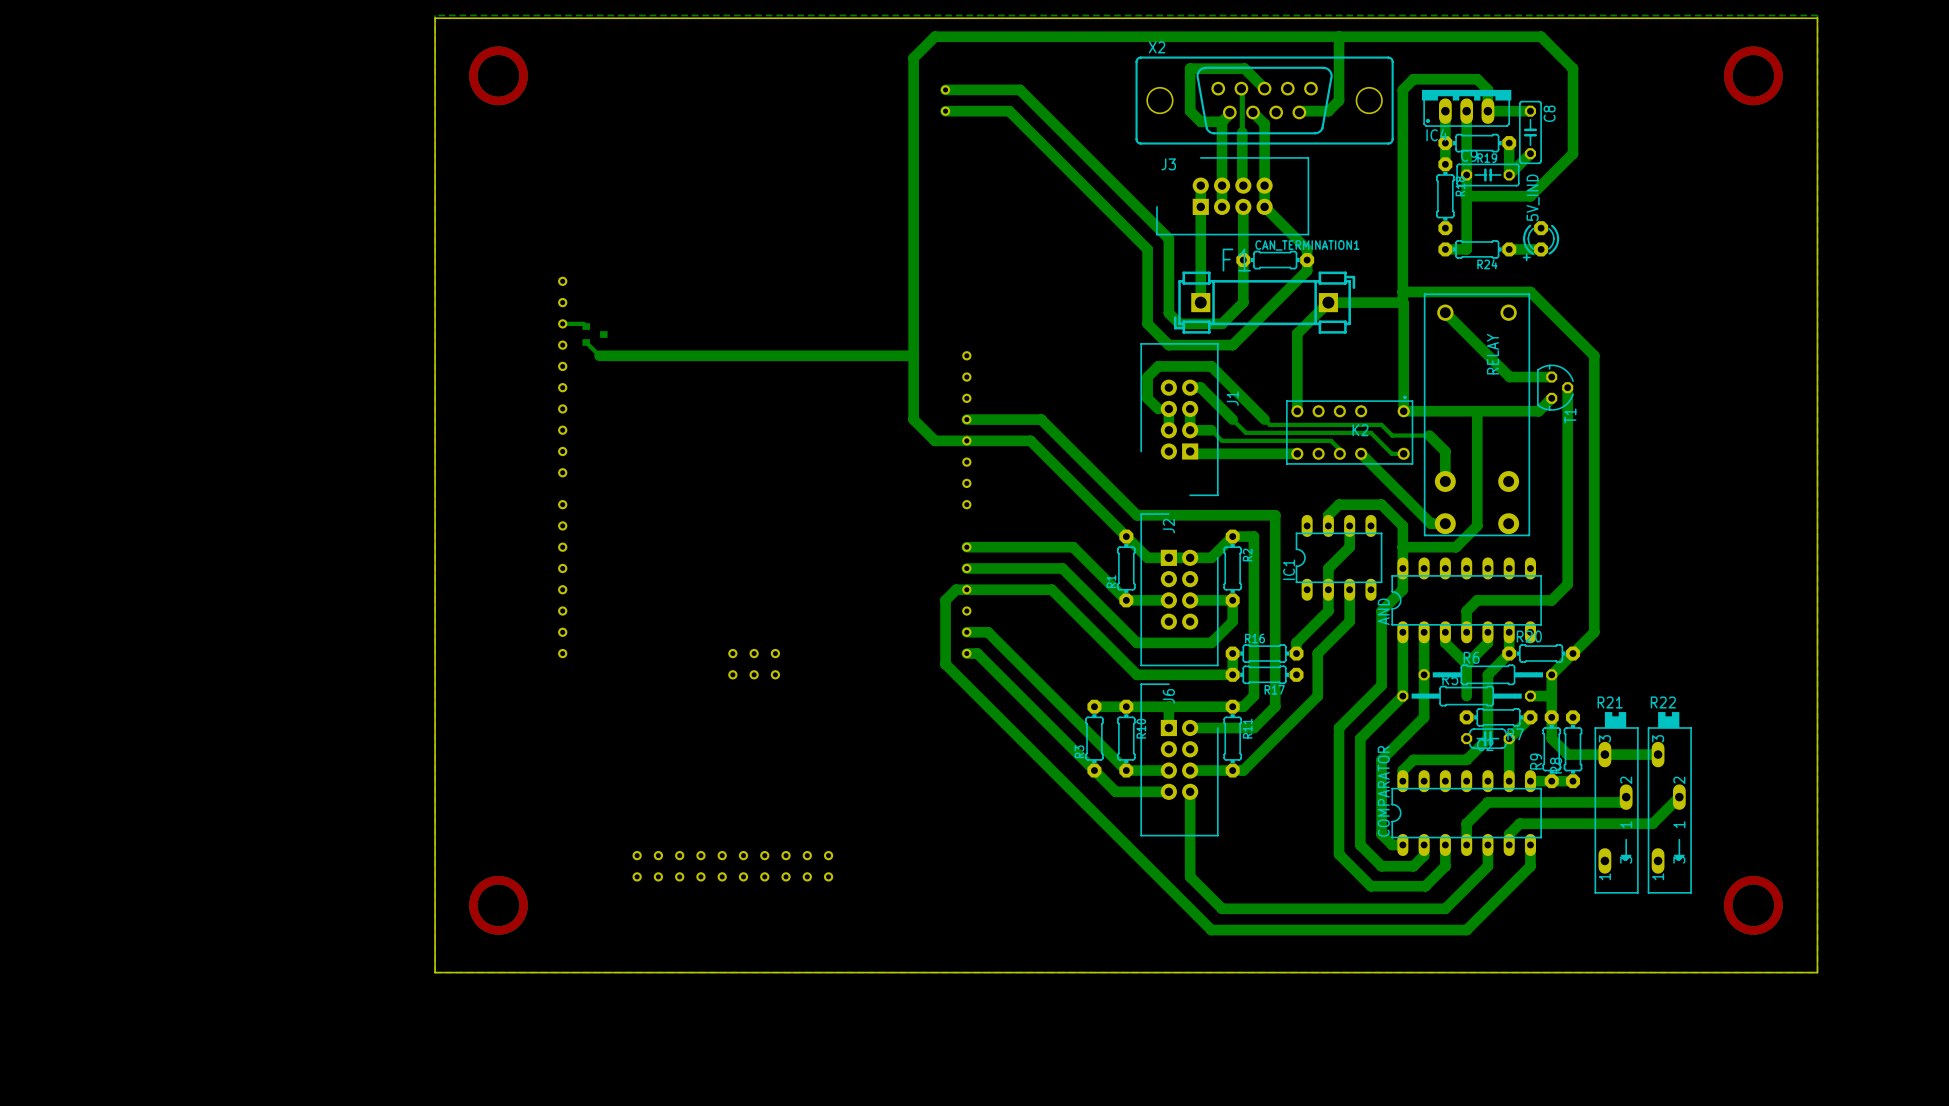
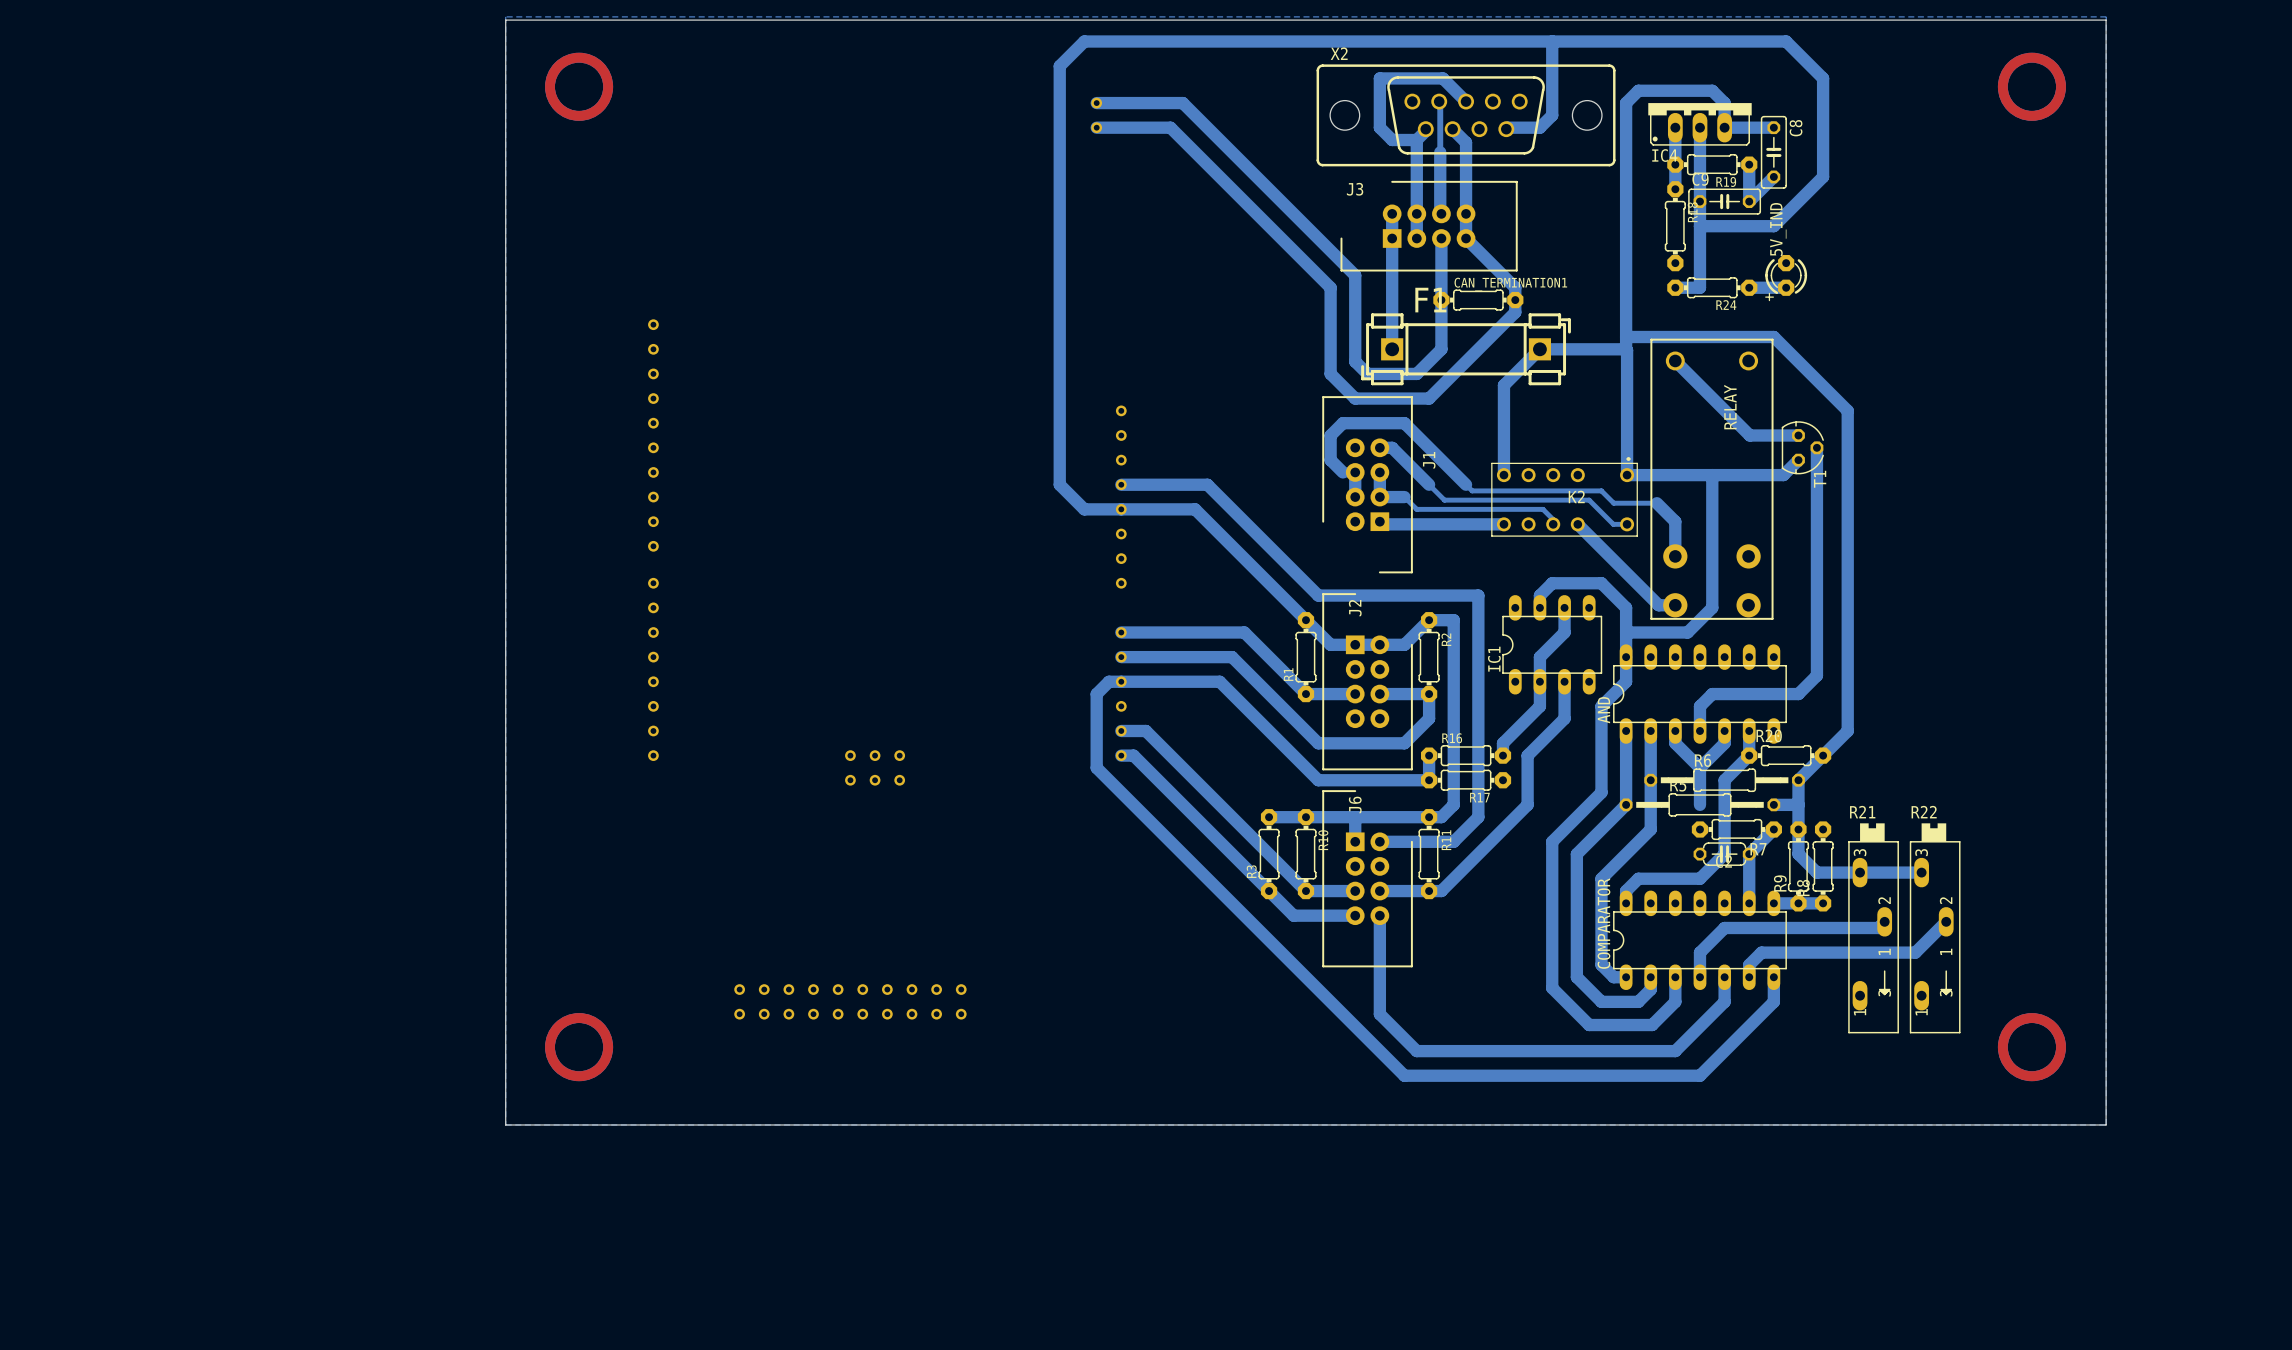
bottom track: (562, 323) (583, 323) (586, 326) -> none
part: (595, 334) -> none
bottom track: (586, 342) (599, 355) (913, 355) -> none

